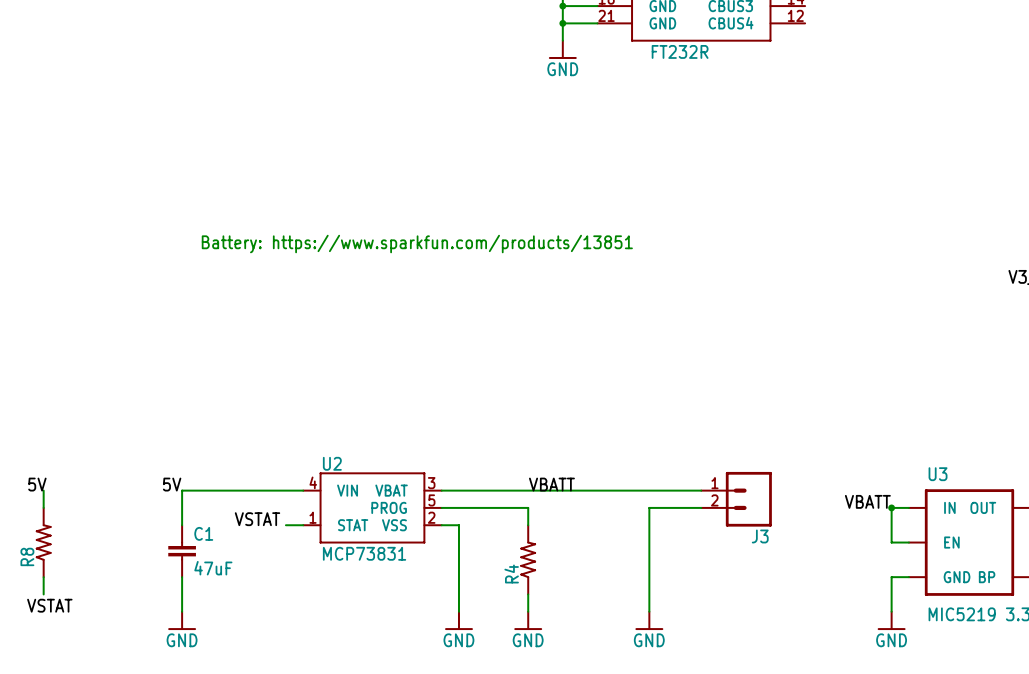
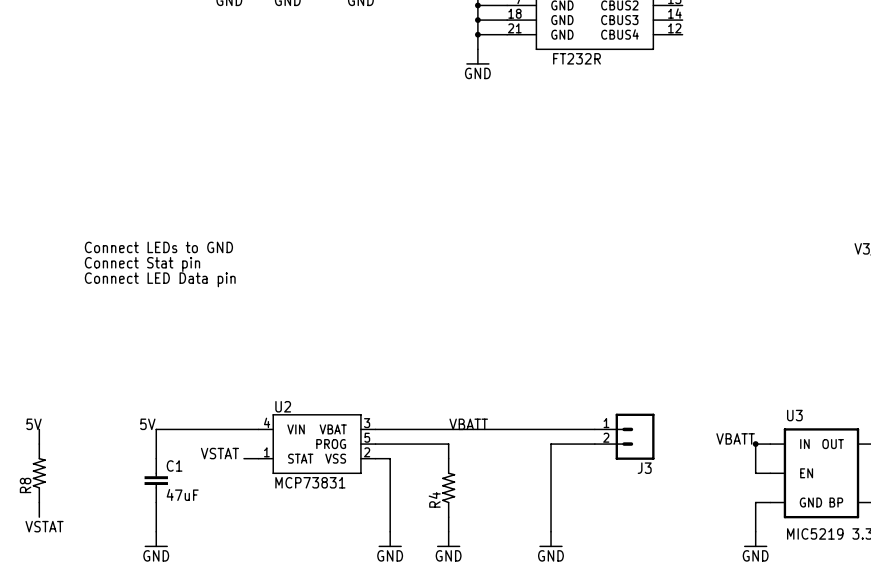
text: Battery: https://www.sparkfun.com/products/13851 (417, 244) -> none
text: none -> Connect LEDs to GND (158, 247)
text: none -> Connect Stat pin (142, 264)
text: none -> Connect LED Data pin (160, 279)

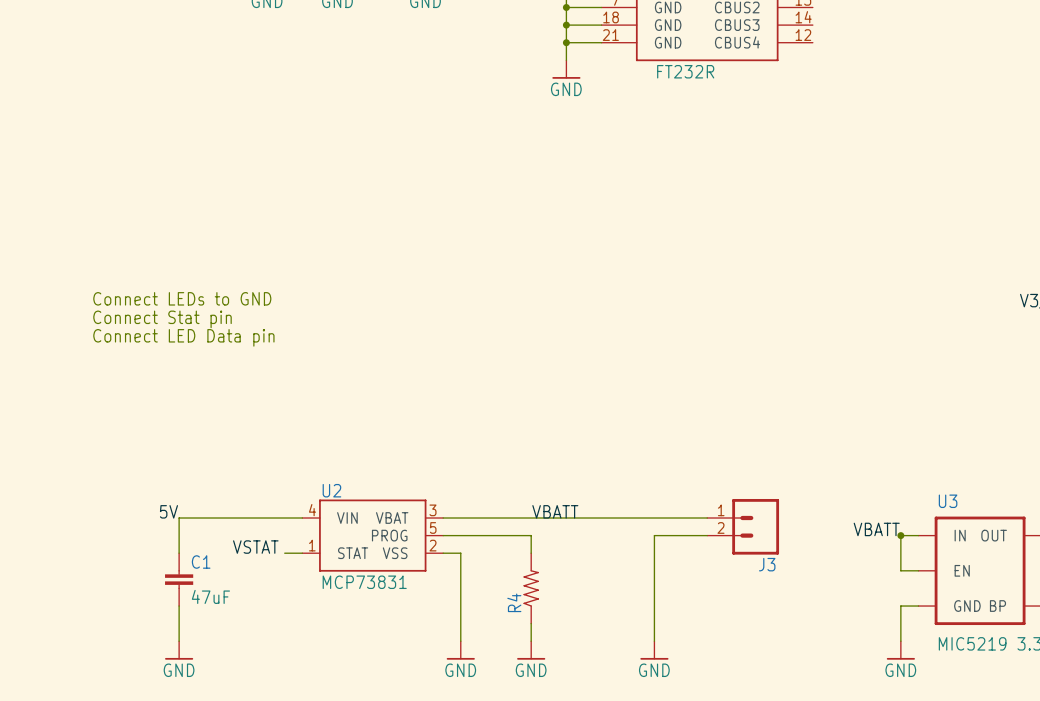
label: 5V (34, 424) -> none
wire: (39, 429) (39, 444) -> none
R8: (39, 473) -> none
wire: (39, 502) (39, 517) -> none
label: VSTAT (44, 526) -> none

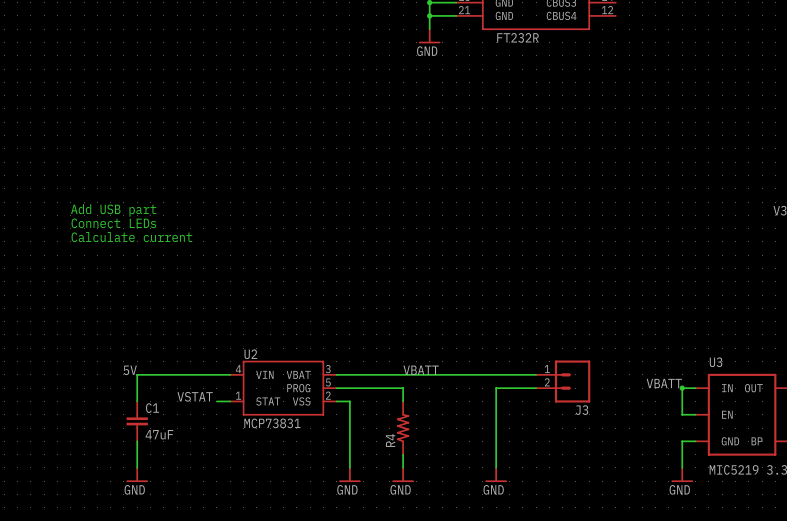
text: Connect LEDs to GND (182, 298) -> Add USB part (113, 210)
text: Connect Stat pin (162, 319) -> Connect LEDs (113, 223)
text: Connect LED Data pin (183, 337) -> Calculate current (131, 237)

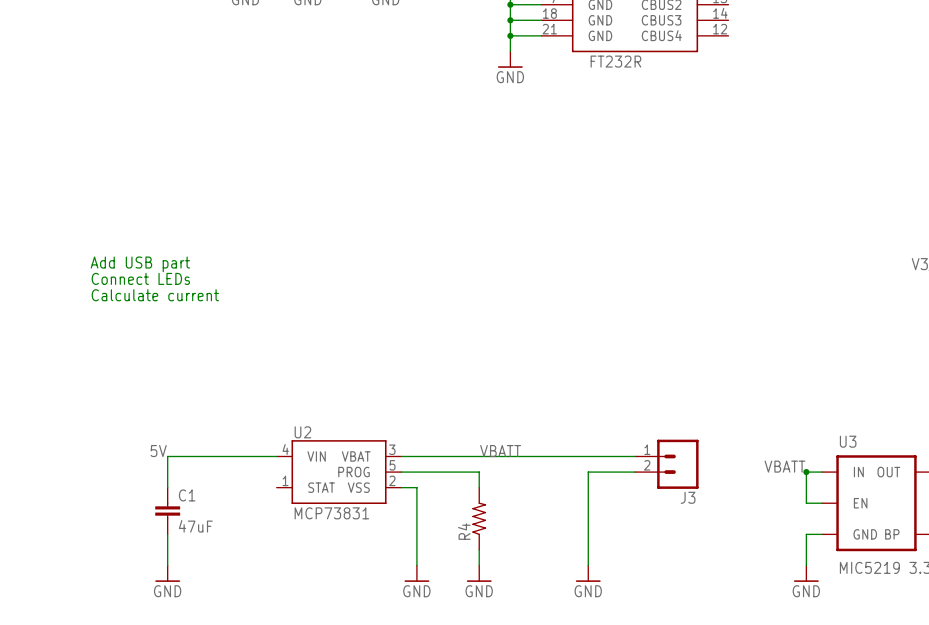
label: VSTAT (195, 396) -> none
wire: (216, 401) (230, 401) -> none

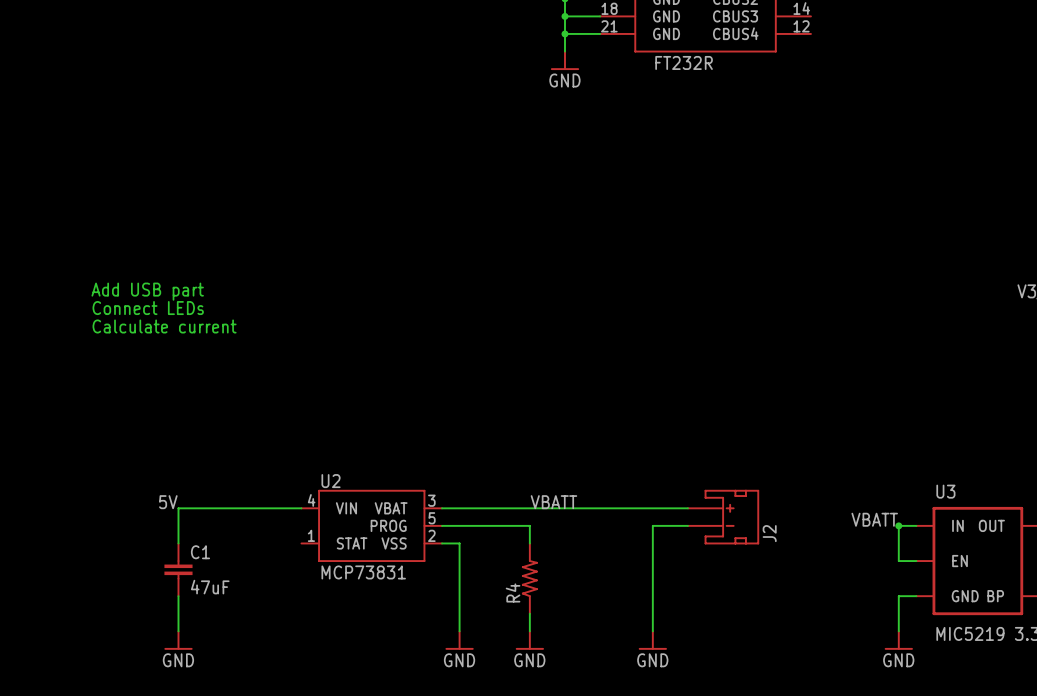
J2: none -> (723, 517)
J3: (666, 464) -> none

